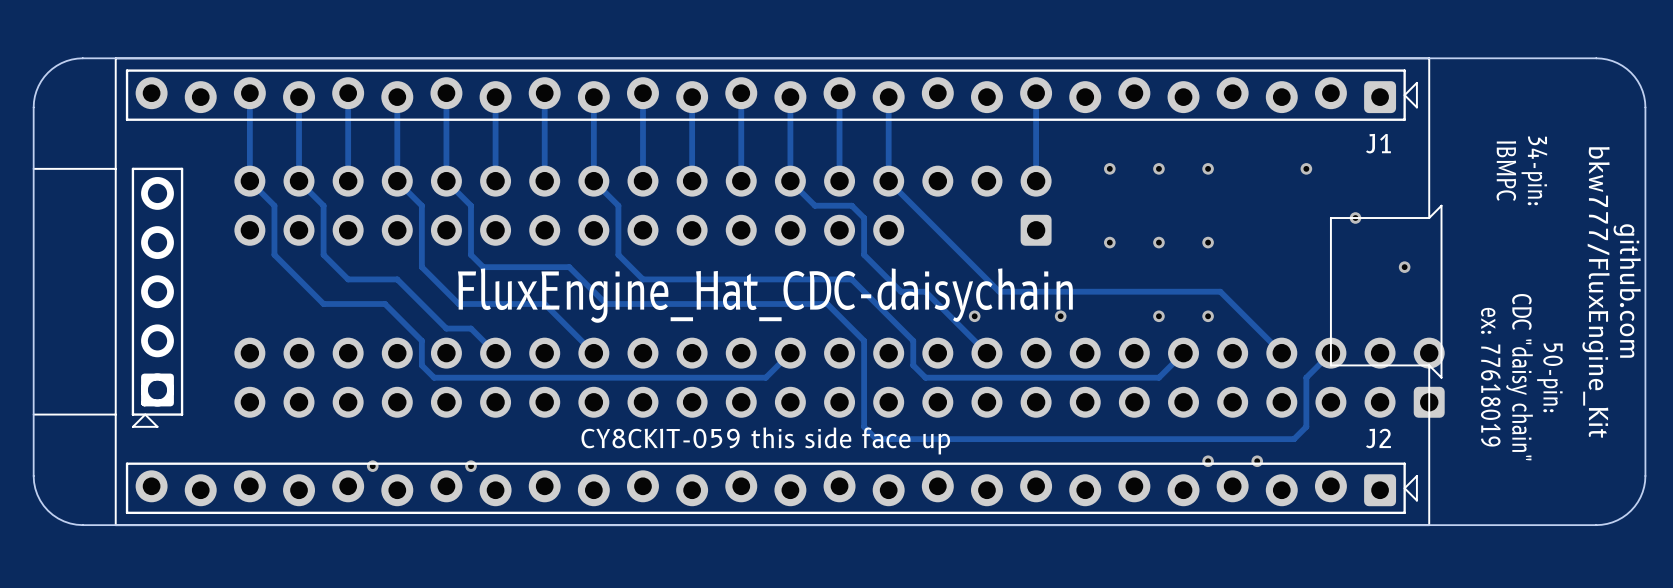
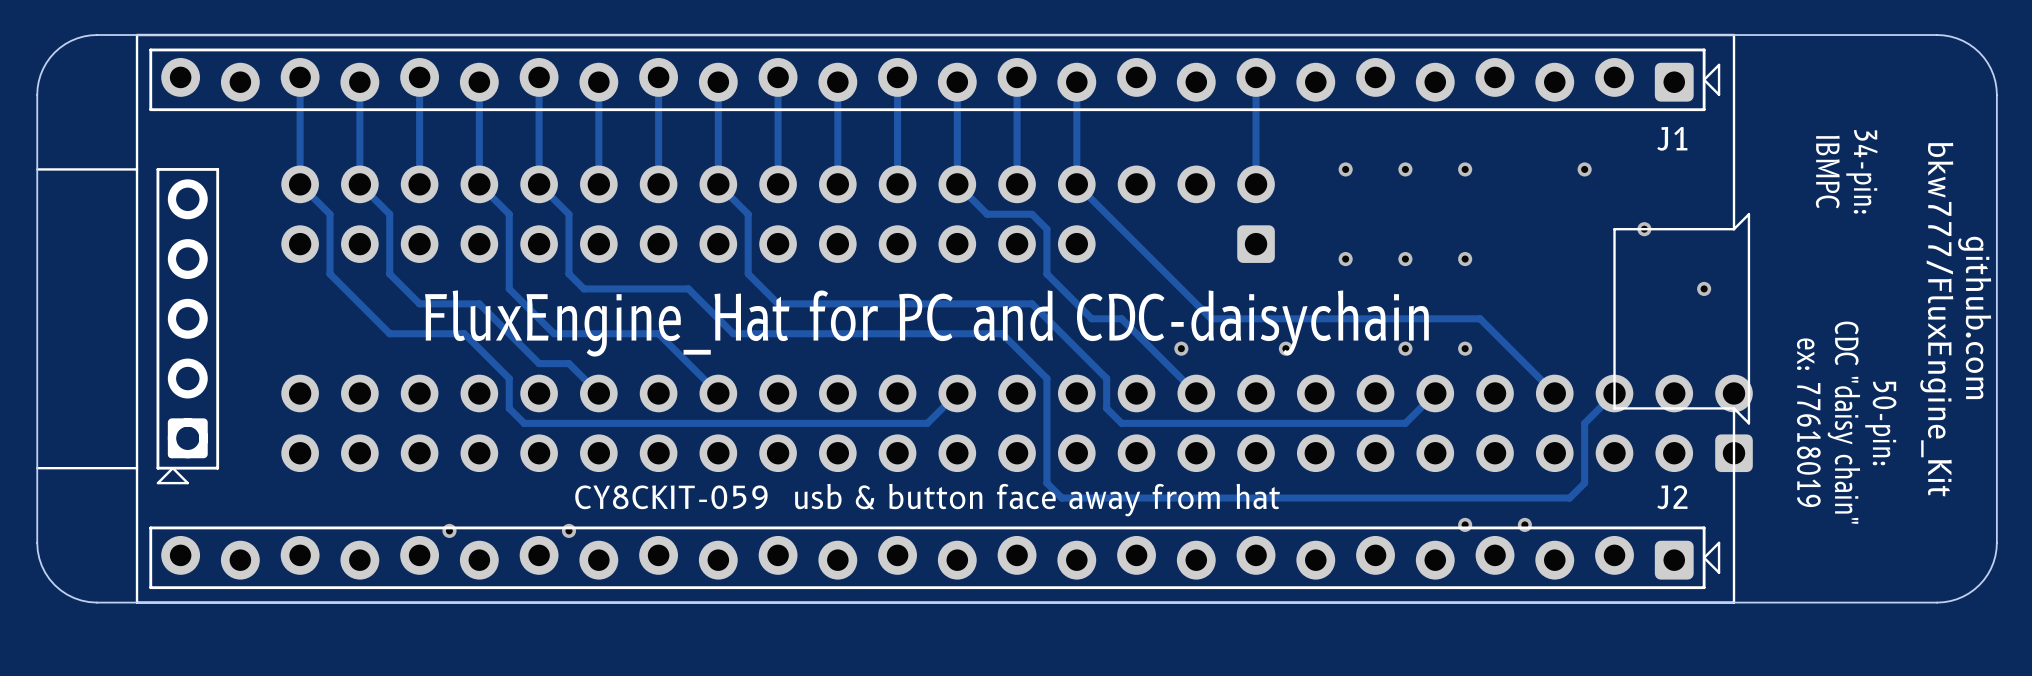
text: FluxEngine_Hat_CDC-daisychain (765, 295) -> FluxEngine_Hat for PC and CDC-daisychain (926, 323)
text: CY8CKIT-059 this side face up (765, 440) -> CY8CKIT-059 usb & button face away from hat (927, 500)

